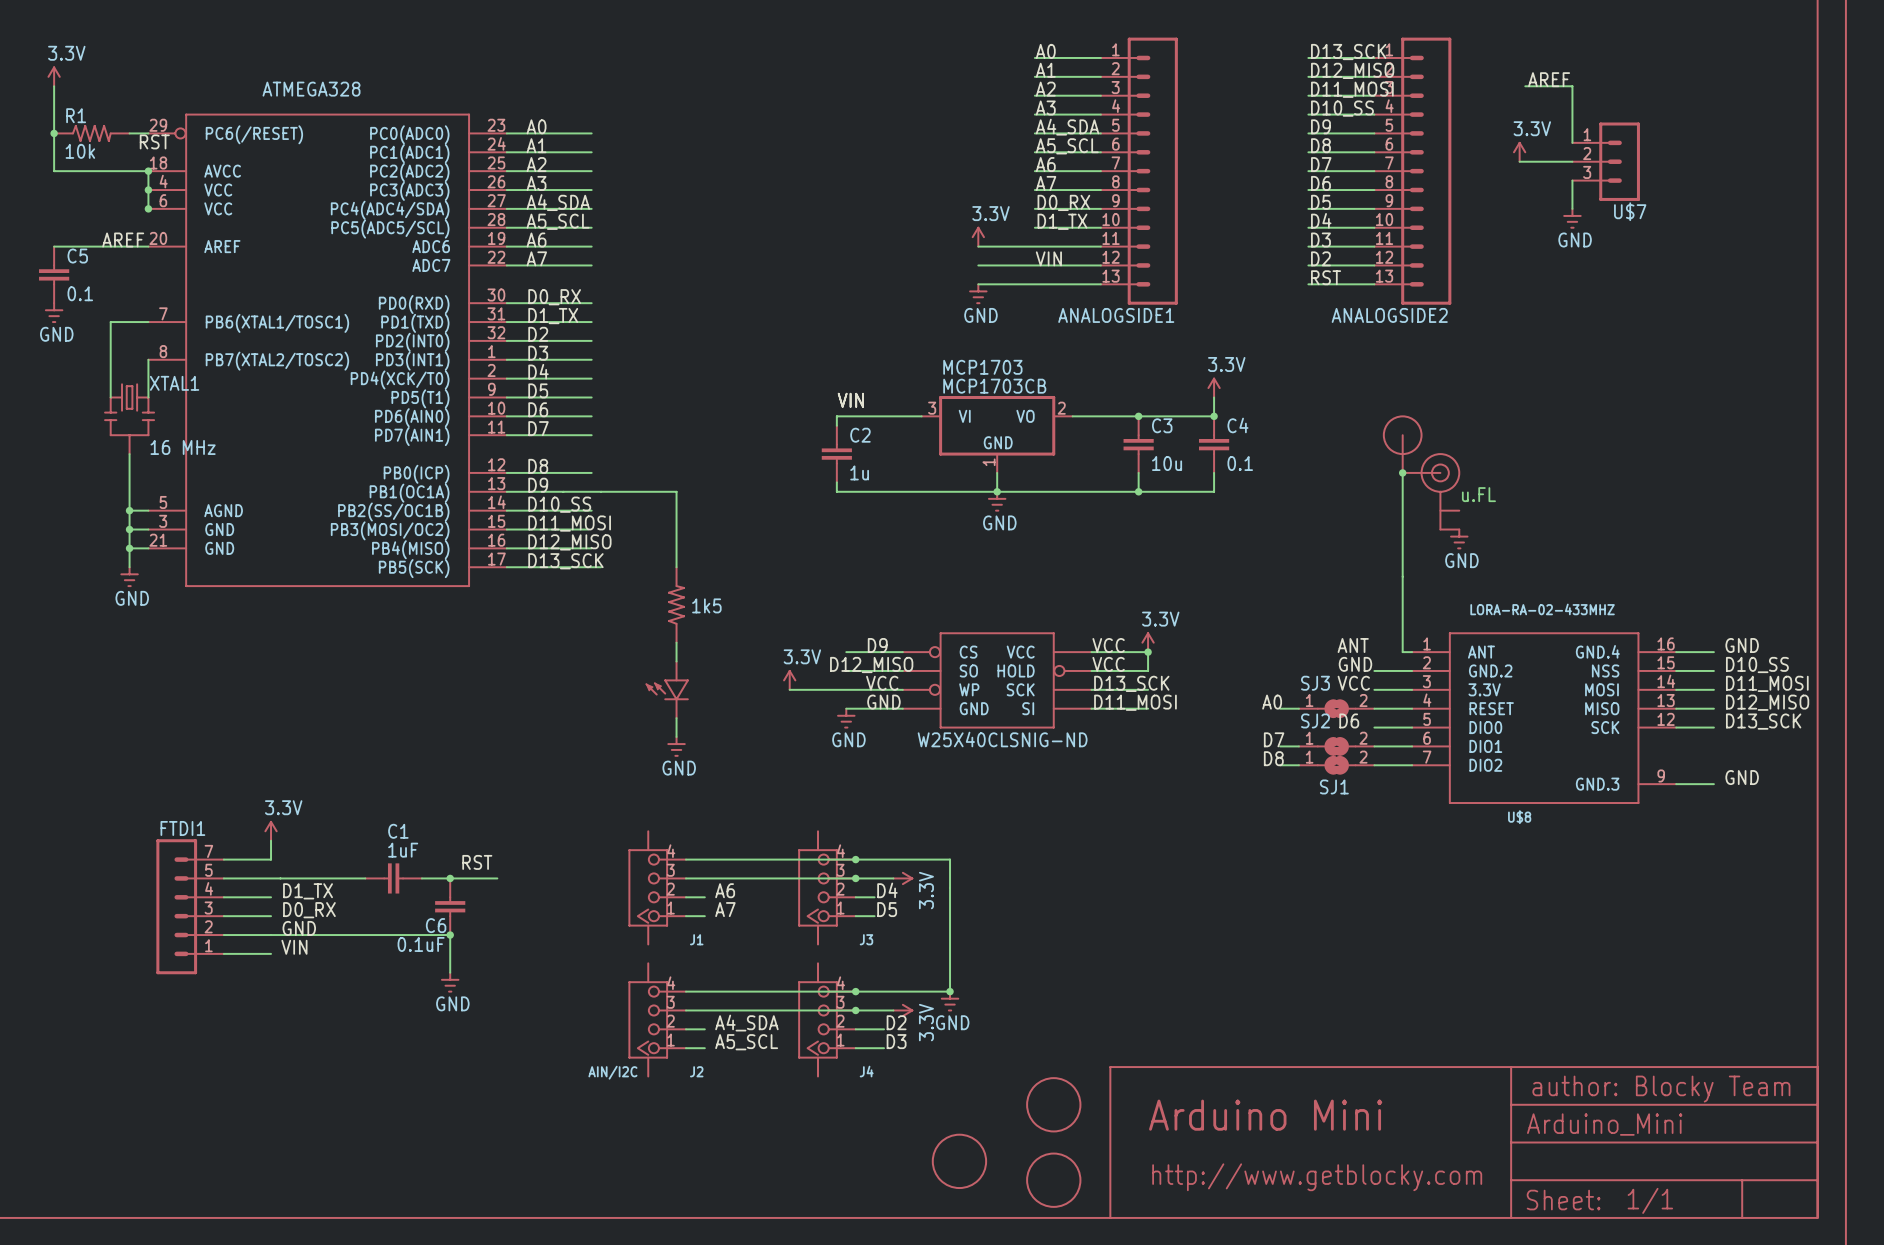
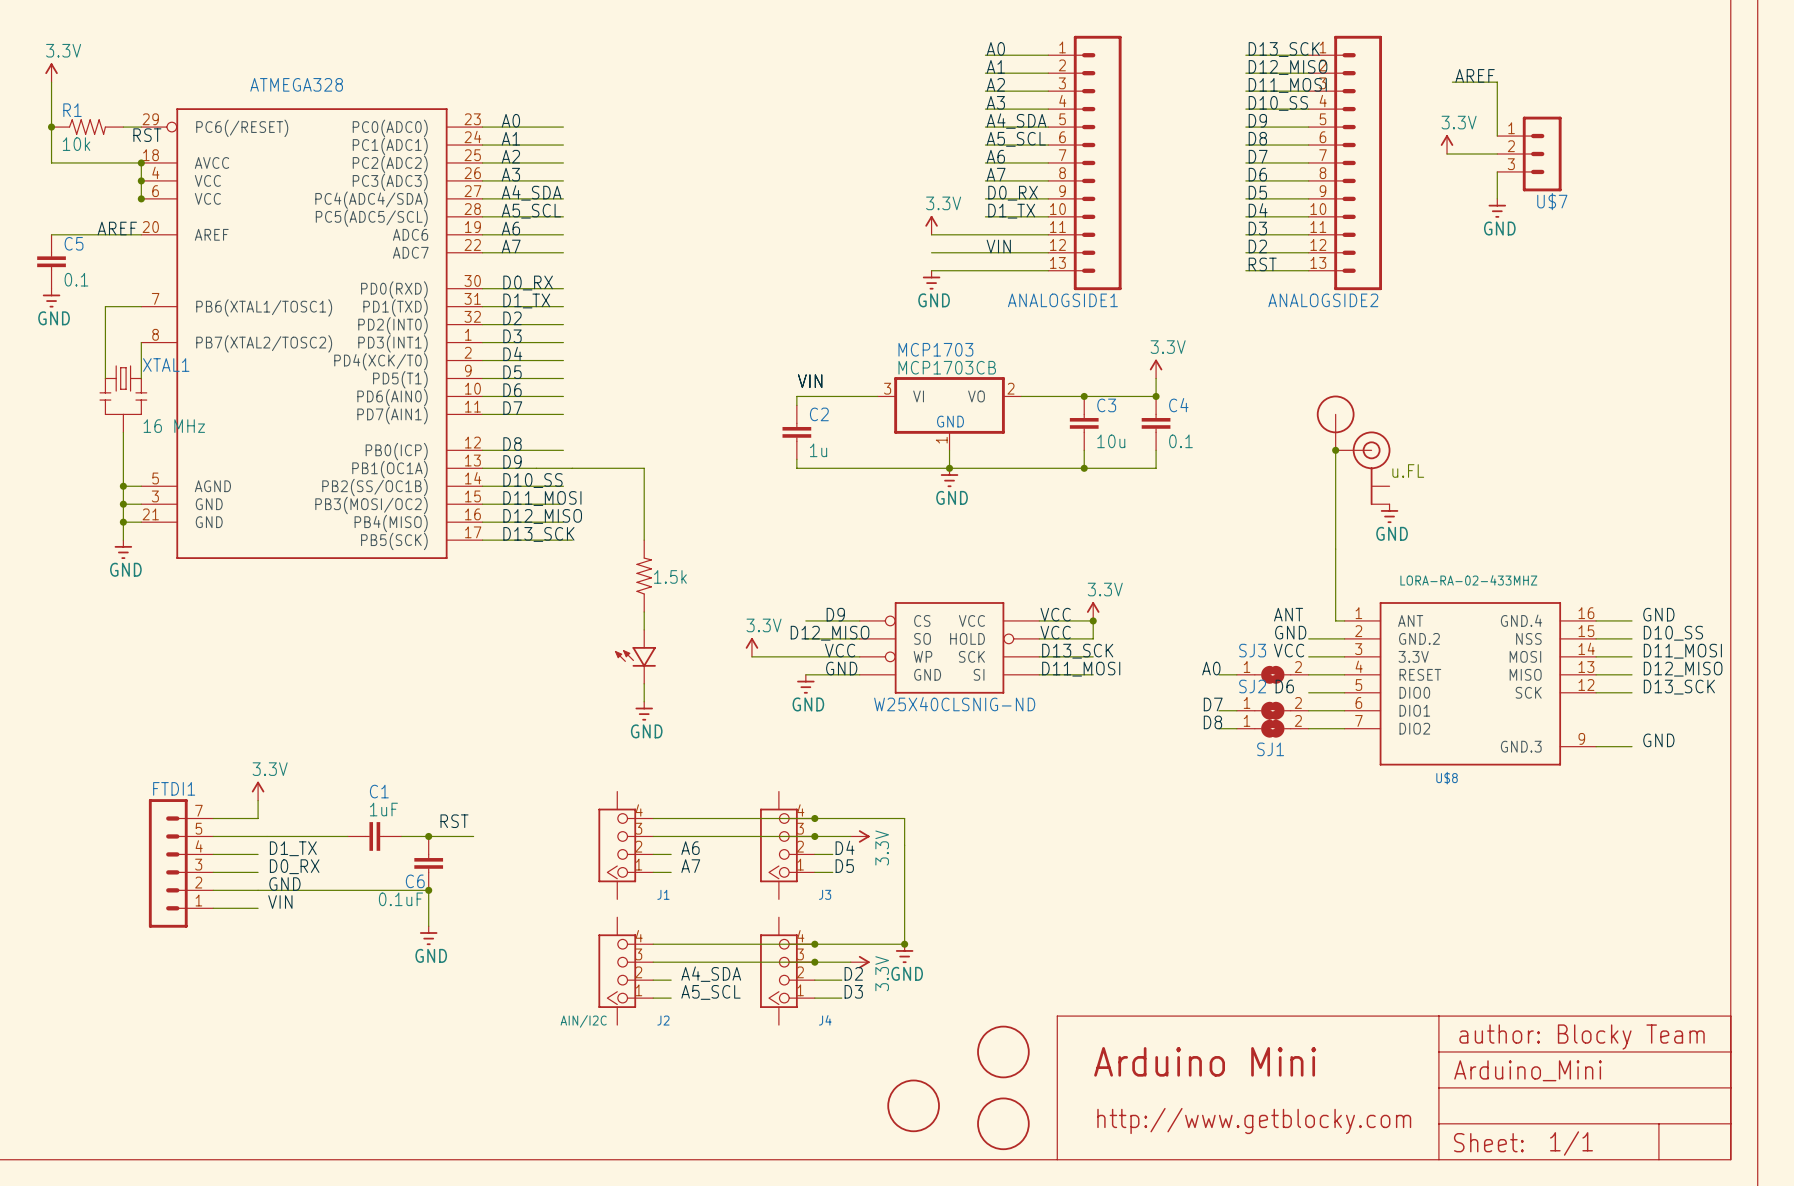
part value: 1k5 (706, 605) -> 1.5k (670, 576)

